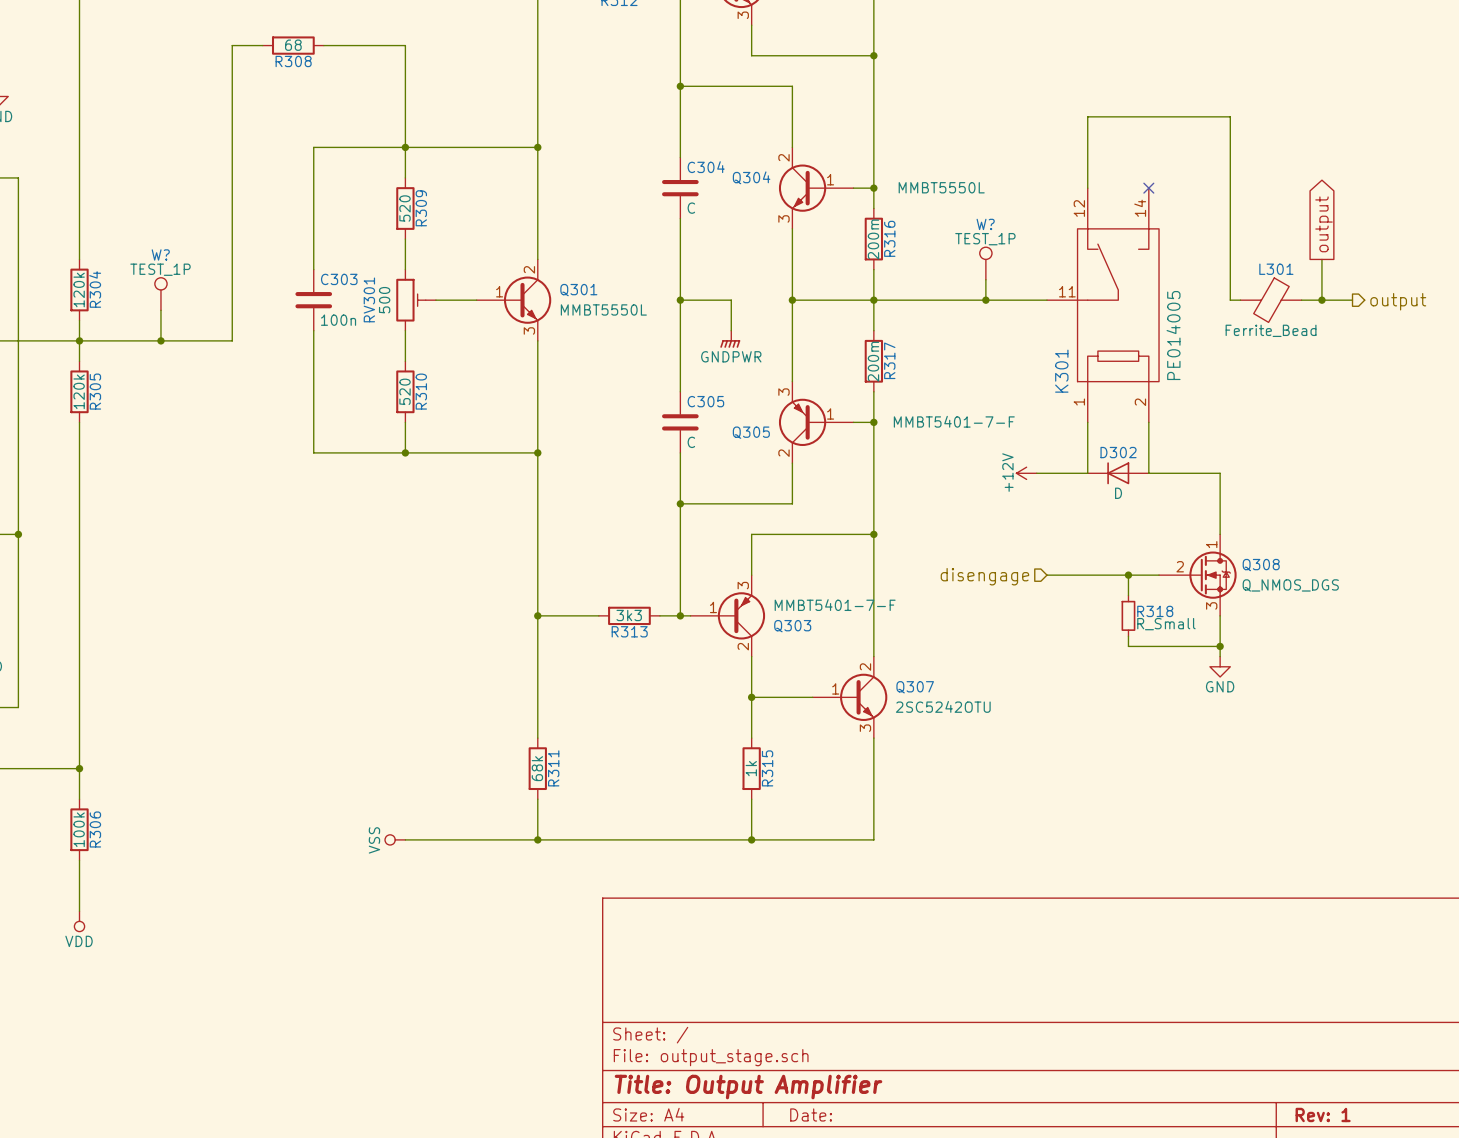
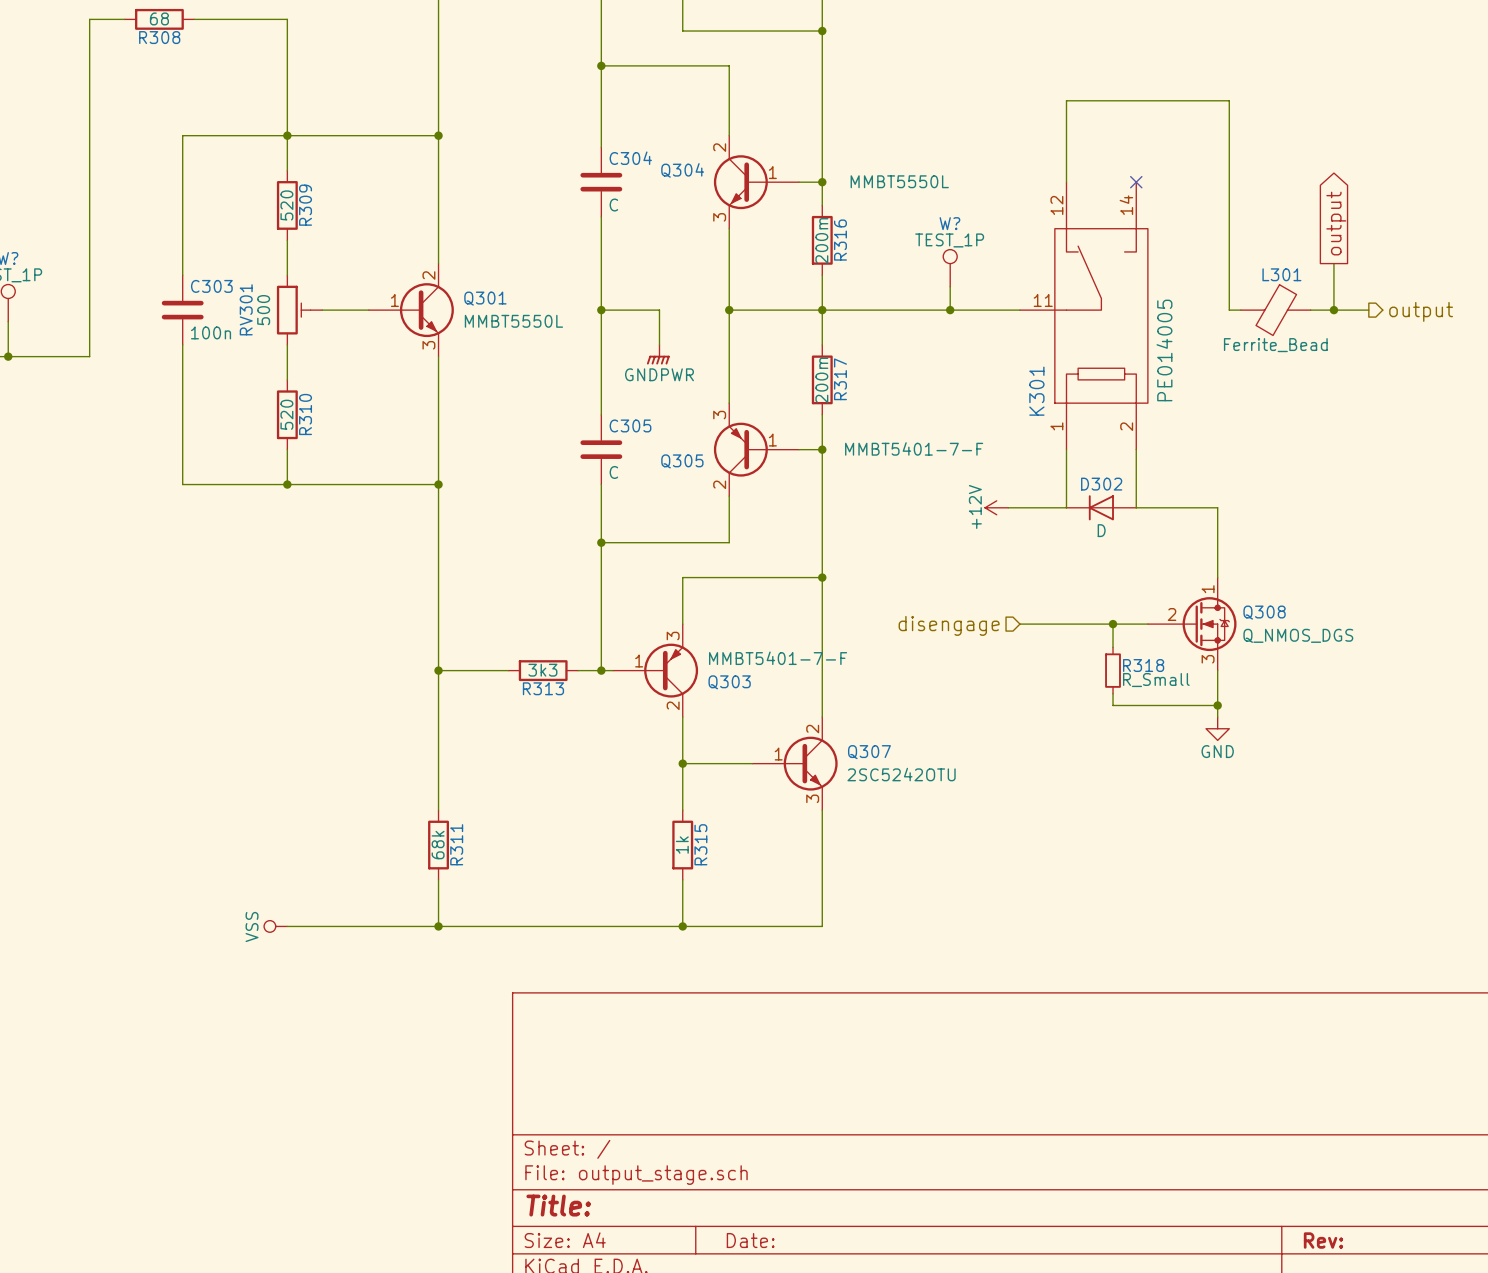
title block: Title: Output Amplifier (748, 1087) -> Title: (558, 1205)
title block: Rev: 1 (1323, 1114) -> Rev: (1323, 1240)

